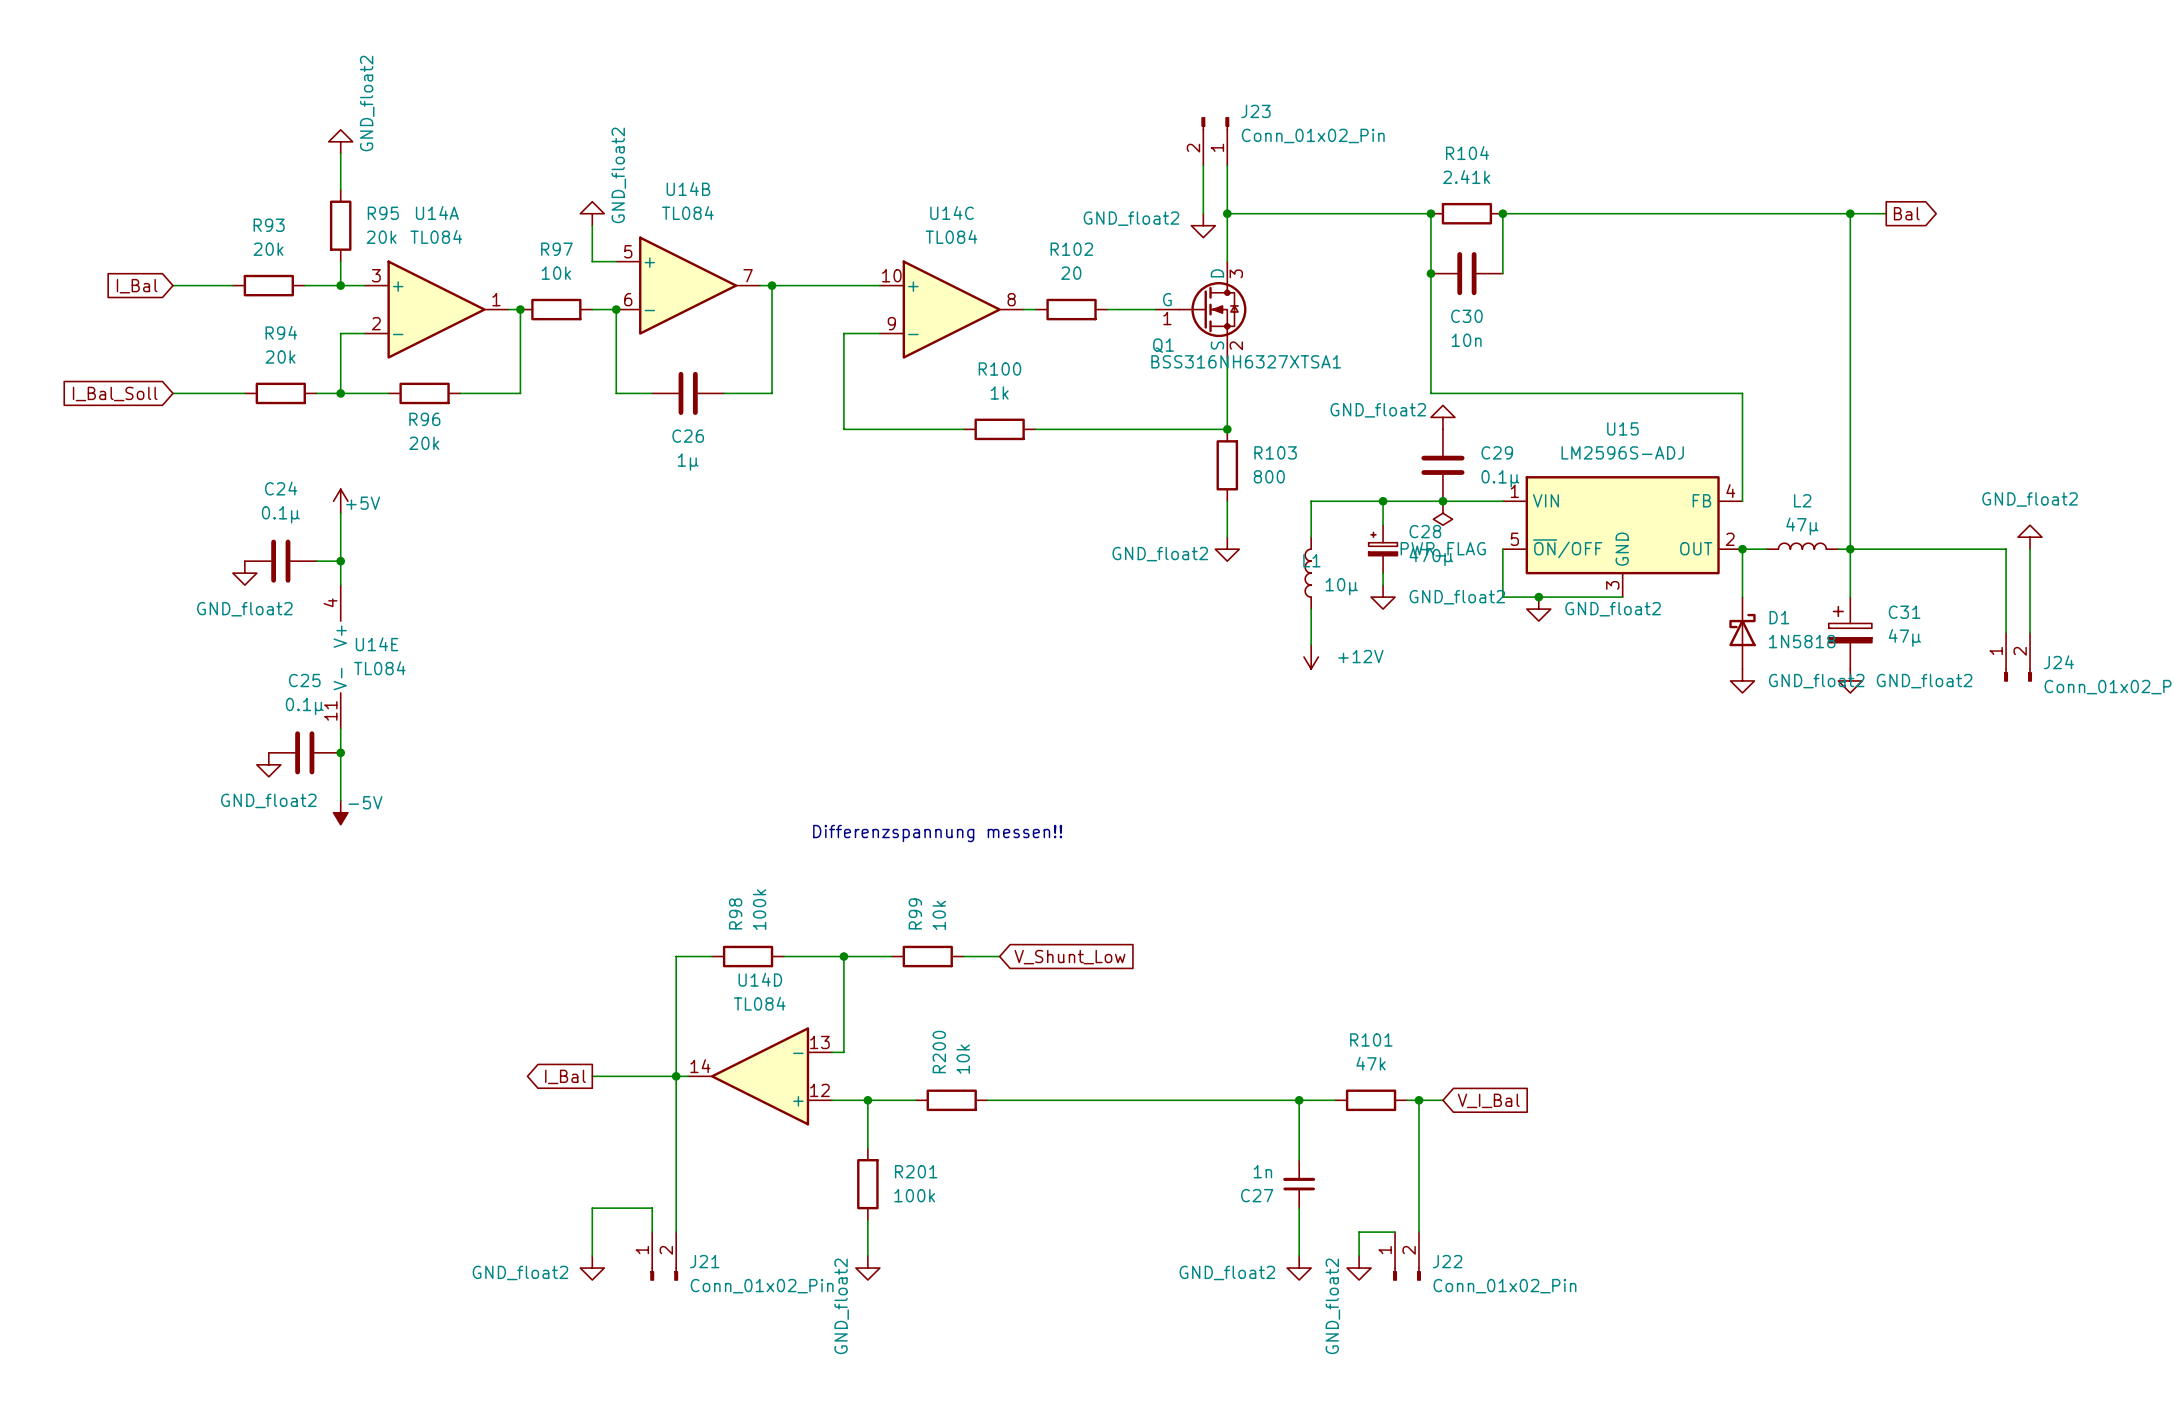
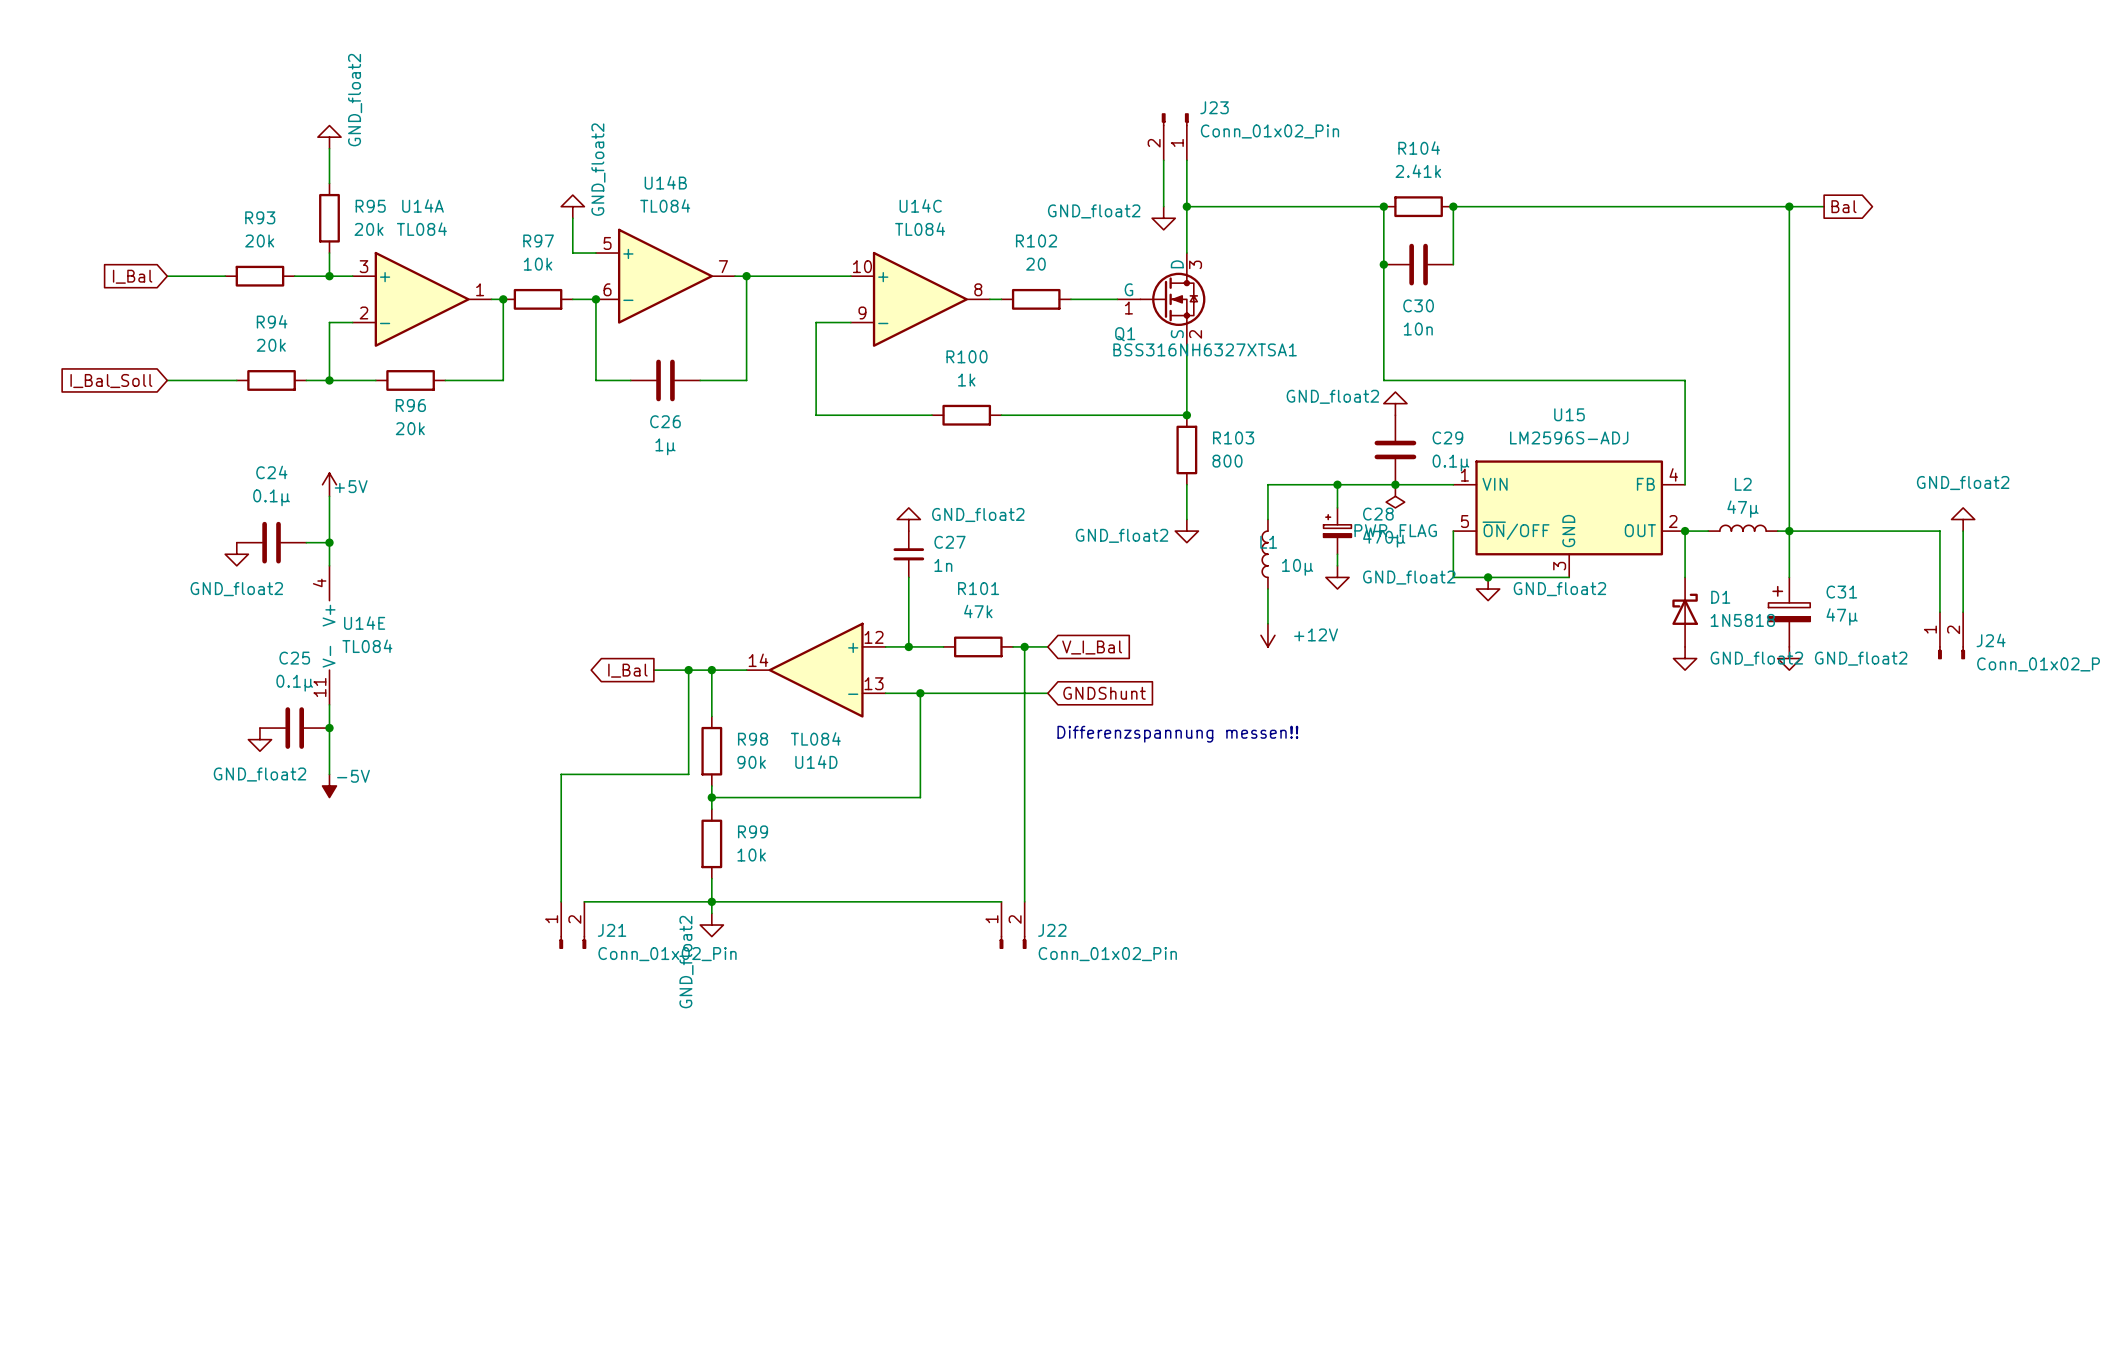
power symbol: none -> GND_float2 (908, 519)
wire: none -> (908, 577) (908, 646)
wire: none -> (885, 646) (943, 646)
junction: none -> (908, 646)
wire: none -> (1013, 646) (1047, 646)
wire: none -> (1024, 646) (1024, 901)
junction: none -> (1024, 646)
global label: none -> V_I_Bal (1092, 647)
wire: none -> (653, 670) (746, 670)
wire: none -> (688, 670) (688, 774) (561, 774) (561, 901)
junction: none -> (688, 670)
wire: none -> (711, 670) (711, 716)
junction: none -> (711, 670)
global label: none -> I_Bal (627, 670)
wire: none -> (885, 693) (1047, 693)
wire: none -> (920, 693) (920, 797) (711, 797)
junction: none -> (920, 693)
global label: none -> GNDShunt (1104, 693)
text: none -> Differenzspannung messen!! (1177, 734)
wire: none -> (711, 785) (711, 809)
junction: none -> (711, 797)
text: Differenzspannung messen!! (937, 833) -> none
wire: none -> (711, 878) (711, 913)
R98 value: 100k (759, 909) -> 90k (751, 762)
wire: none -> (584, 901) (1001, 901)
junction: none -> (711, 901)
wire: (712, 956) (676, 956) (676, 1232) -> none
power symbol: none -> GND_float2 (711, 925)
R98 rotation: 0° (748, 956) -> 90° clockwise (711, 751)
R98 position: (748, 956) -> (711, 751)
wire: (784, 956) (891, 956) -> none
wire: (843, 956) (843, 1052) (831, 1052) -> none
junction: (843, 956) -> none
R99 rotation: 0° (927, 956) -> 90° clockwise (711, 843)
R99 position: (927, 956) -> (711, 843)
wire: (963, 956) (999, 956) -> none
global label: V_Shunt_Low (1069, 957) -> none
global label: I_Bal (565, 1076) -> none
wire: (592, 1076) (688, 1076) -> none
junction: (676, 1076) -> none
U14D flip: as is (760, 1076) -> up-down (816, 670)
U14D position: (760, 1076) -> (816, 670)
wire: (831, 1100) (915, 1100) -> none
wire: (867, 1100) (867, 1148) -> none
junction: (867, 1100) -> none
R200: 10k (951, 1100) -> none
wire: (987, 1100) (1335, 1100) -> none
wire: (1299, 1100) (1299, 1160) -> none
junction: (1299, 1100) -> none
R101 position: (1371, 1100) -> (978, 646)
wire: (1407, 1100) (1442, 1100) -> none
wire: (1418, 1100) (1418, 1232) -> none
junction: (1418, 1100) -> none
global label: V_I_Bal (1488, 1100) -> none
R201: 100k (867, 1184) -> none
C27 rotation: 0° (1299, 1184) -> 180° (908, 554)
C27 position: (1299, 1184) -> (908, 554)
wire: (1299, 1208) (1299, 1256) -> none
wire: (867, 1220) (867, 1256) -> none
wire: (652, 1232) (652, 1208) (592, 1208) (592, 1256) -> none
wire: (1395, 1232) (1359, 1232) (1359, 1256) -> none
J21 position: (664, 1256) -> (572, 925)
J22 position: (1407, 1256) -> (1013, 925)
power symbol: GND_float2 (592, 1268) -> none
power symbol: GND_float2 (867, 1268) -> none
power symbol: GND_float2 (1299, 1268) -> none
power symbol: GND_float2 (1359, 1268) -> none

